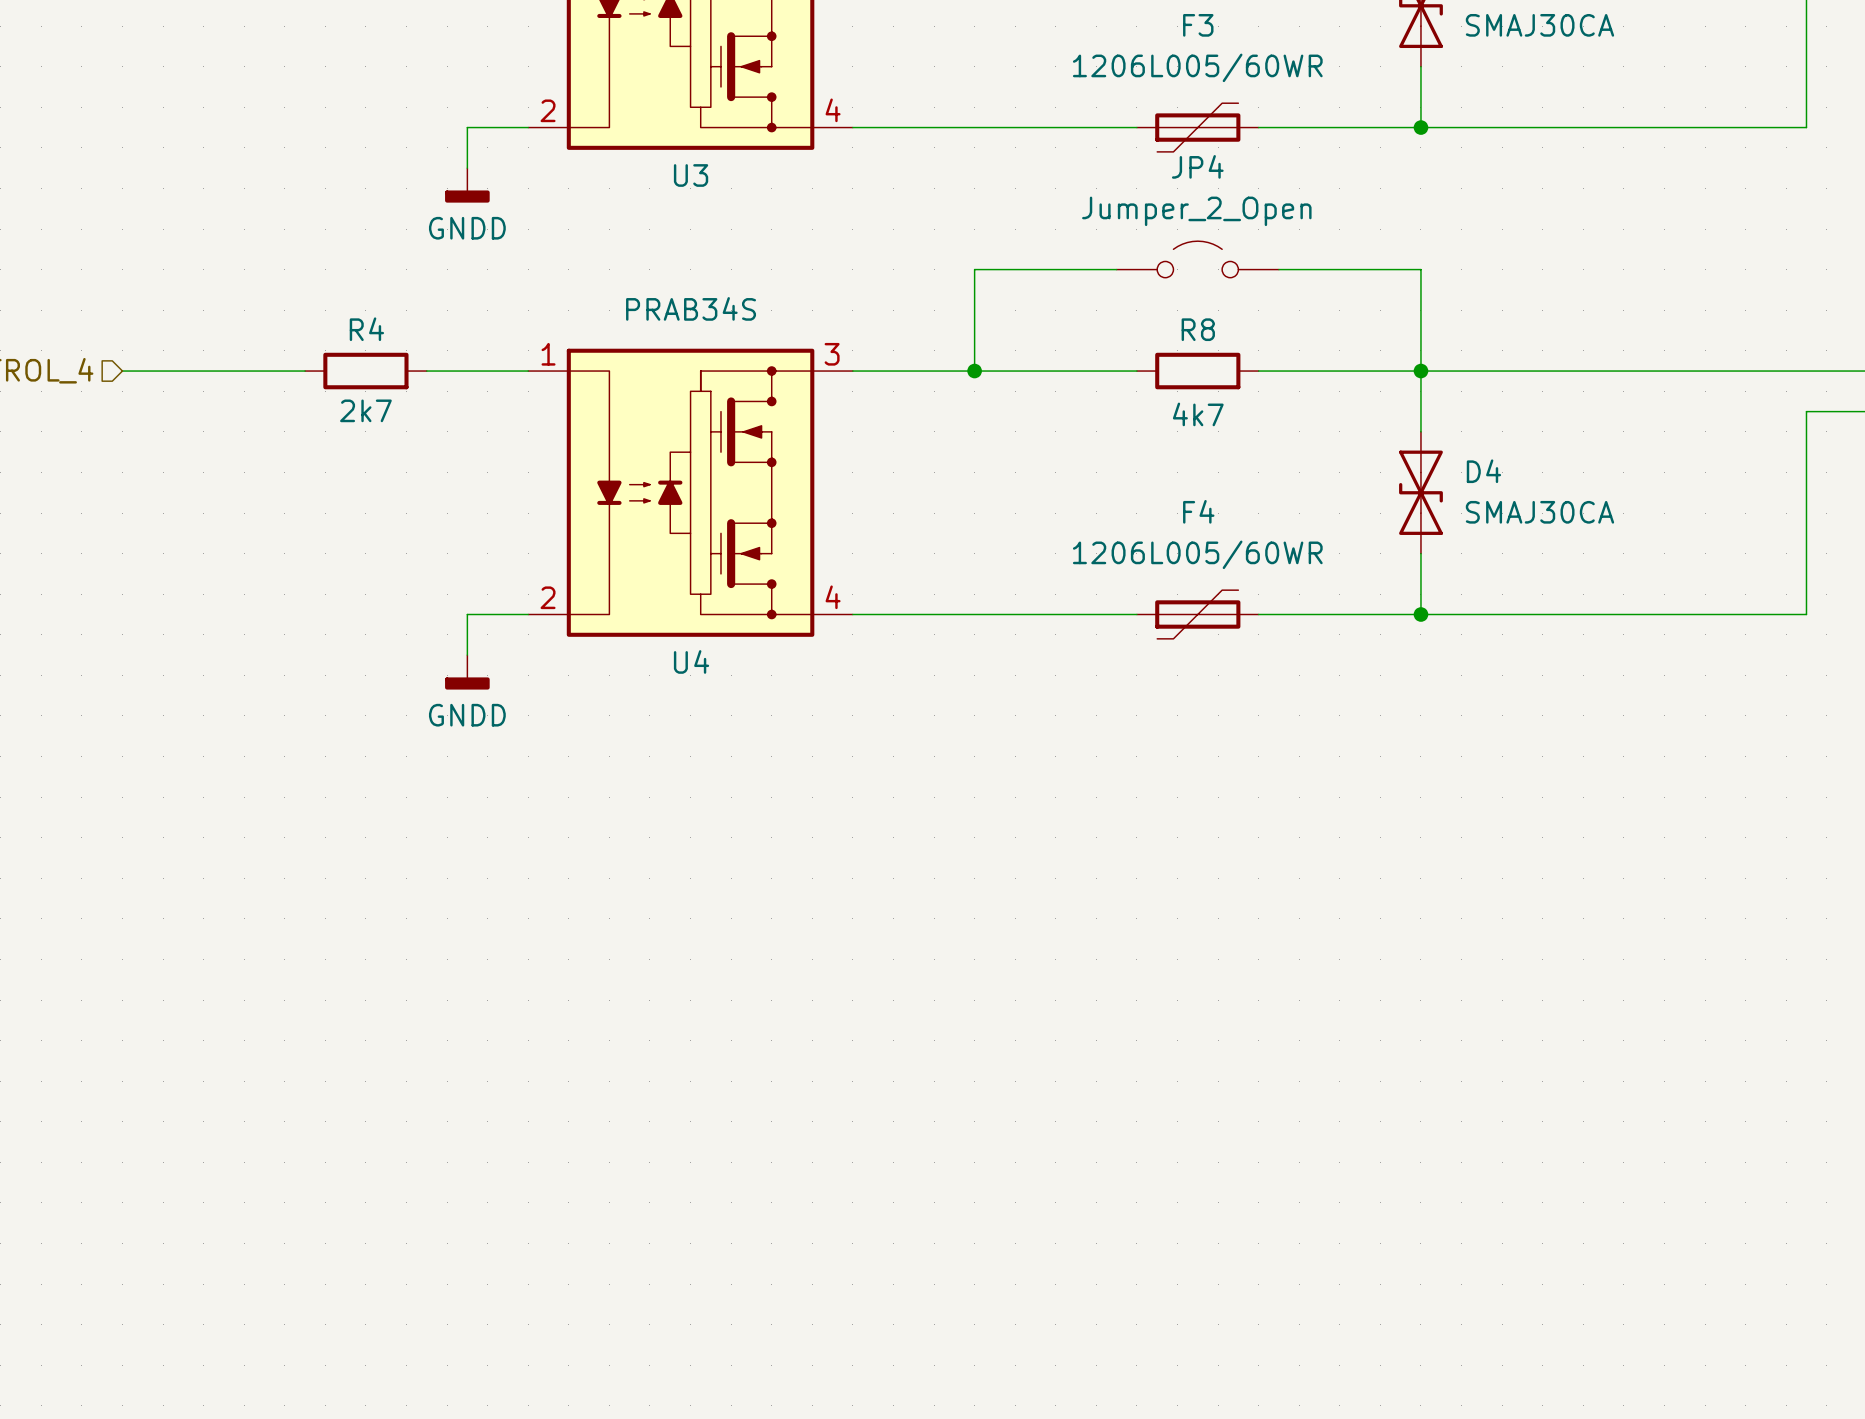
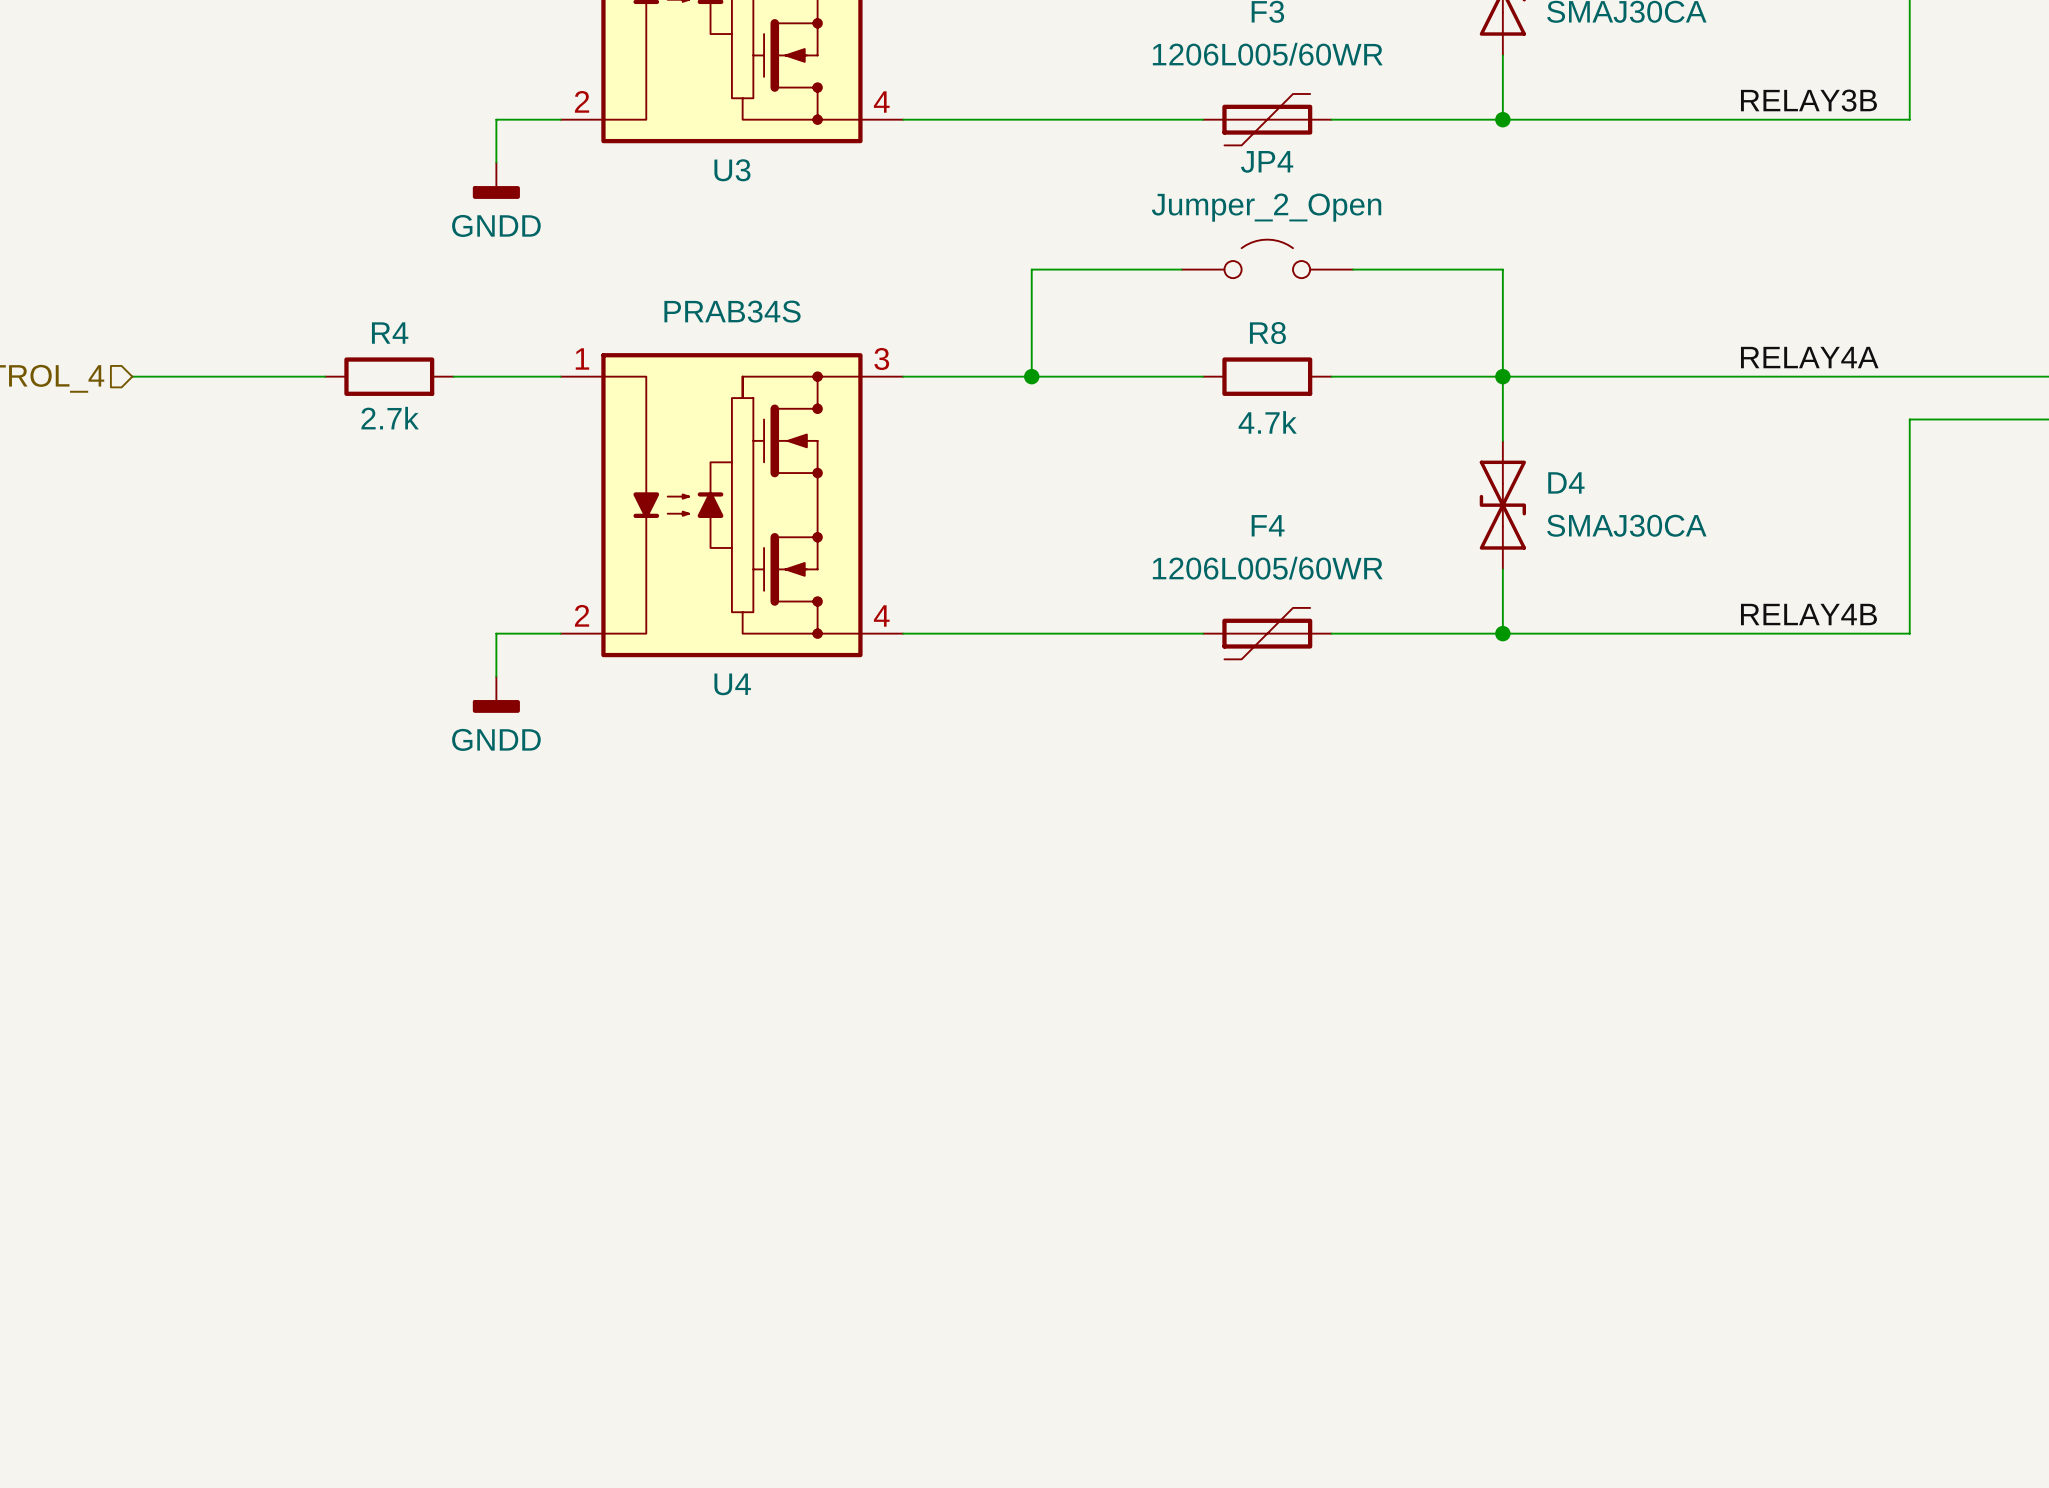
label: none -> RELAY3B (1808, 100)
label: none -> RELAY4A (1809, 357)
R4 value: 2k7 (365, 410) -> 2.7k (390, 418)
R8 value: 4k7 (1198, 414) -> 4.7k (1267, 422)
label: none -> RELAY4B (1808, 614)

